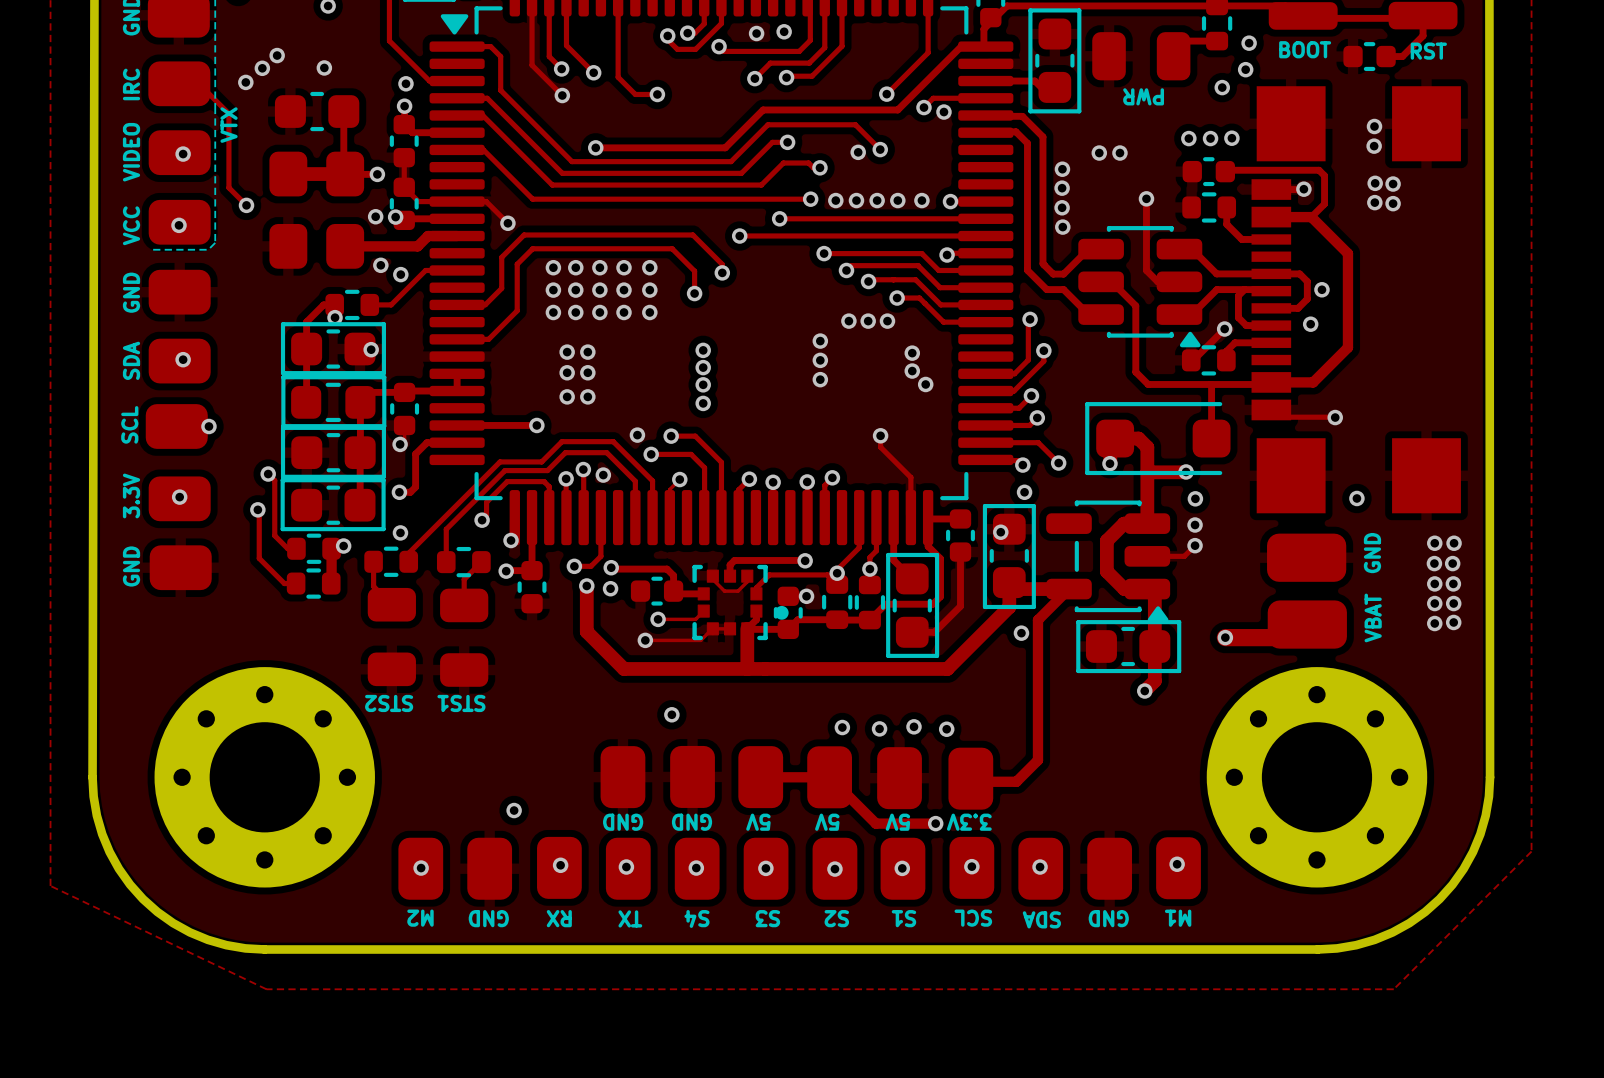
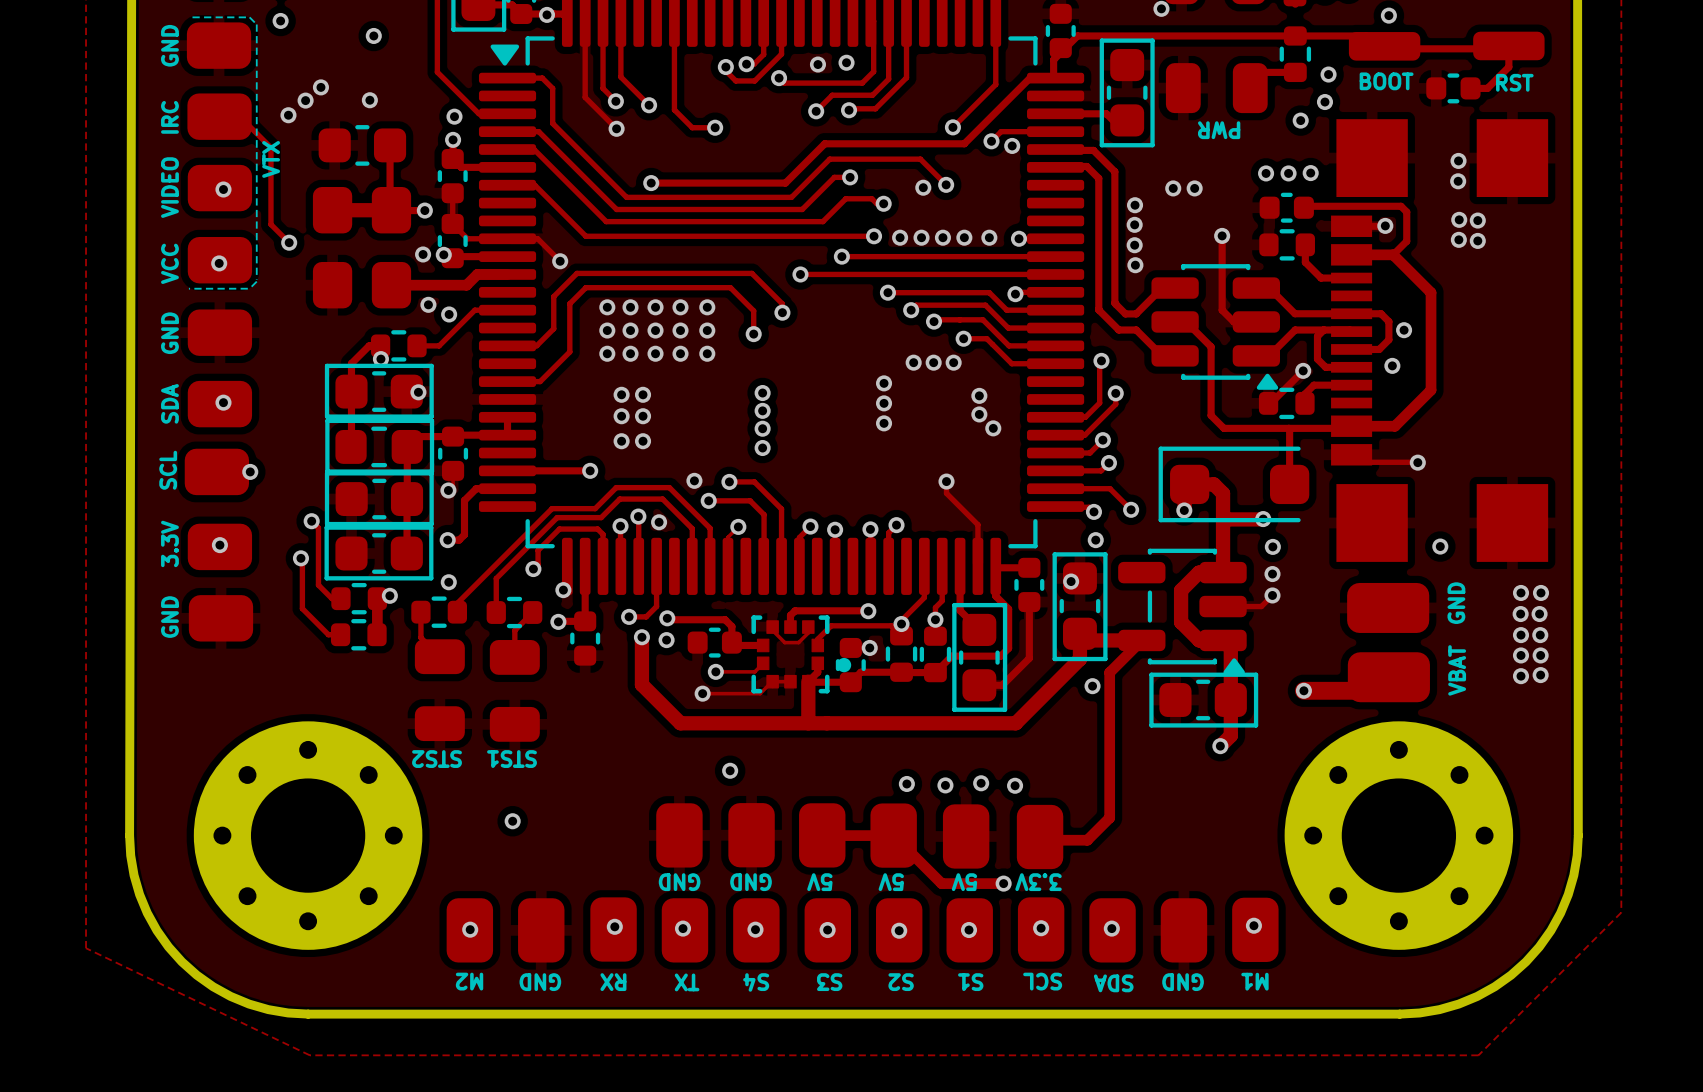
via position: (514, 810) -> (512, 821)

